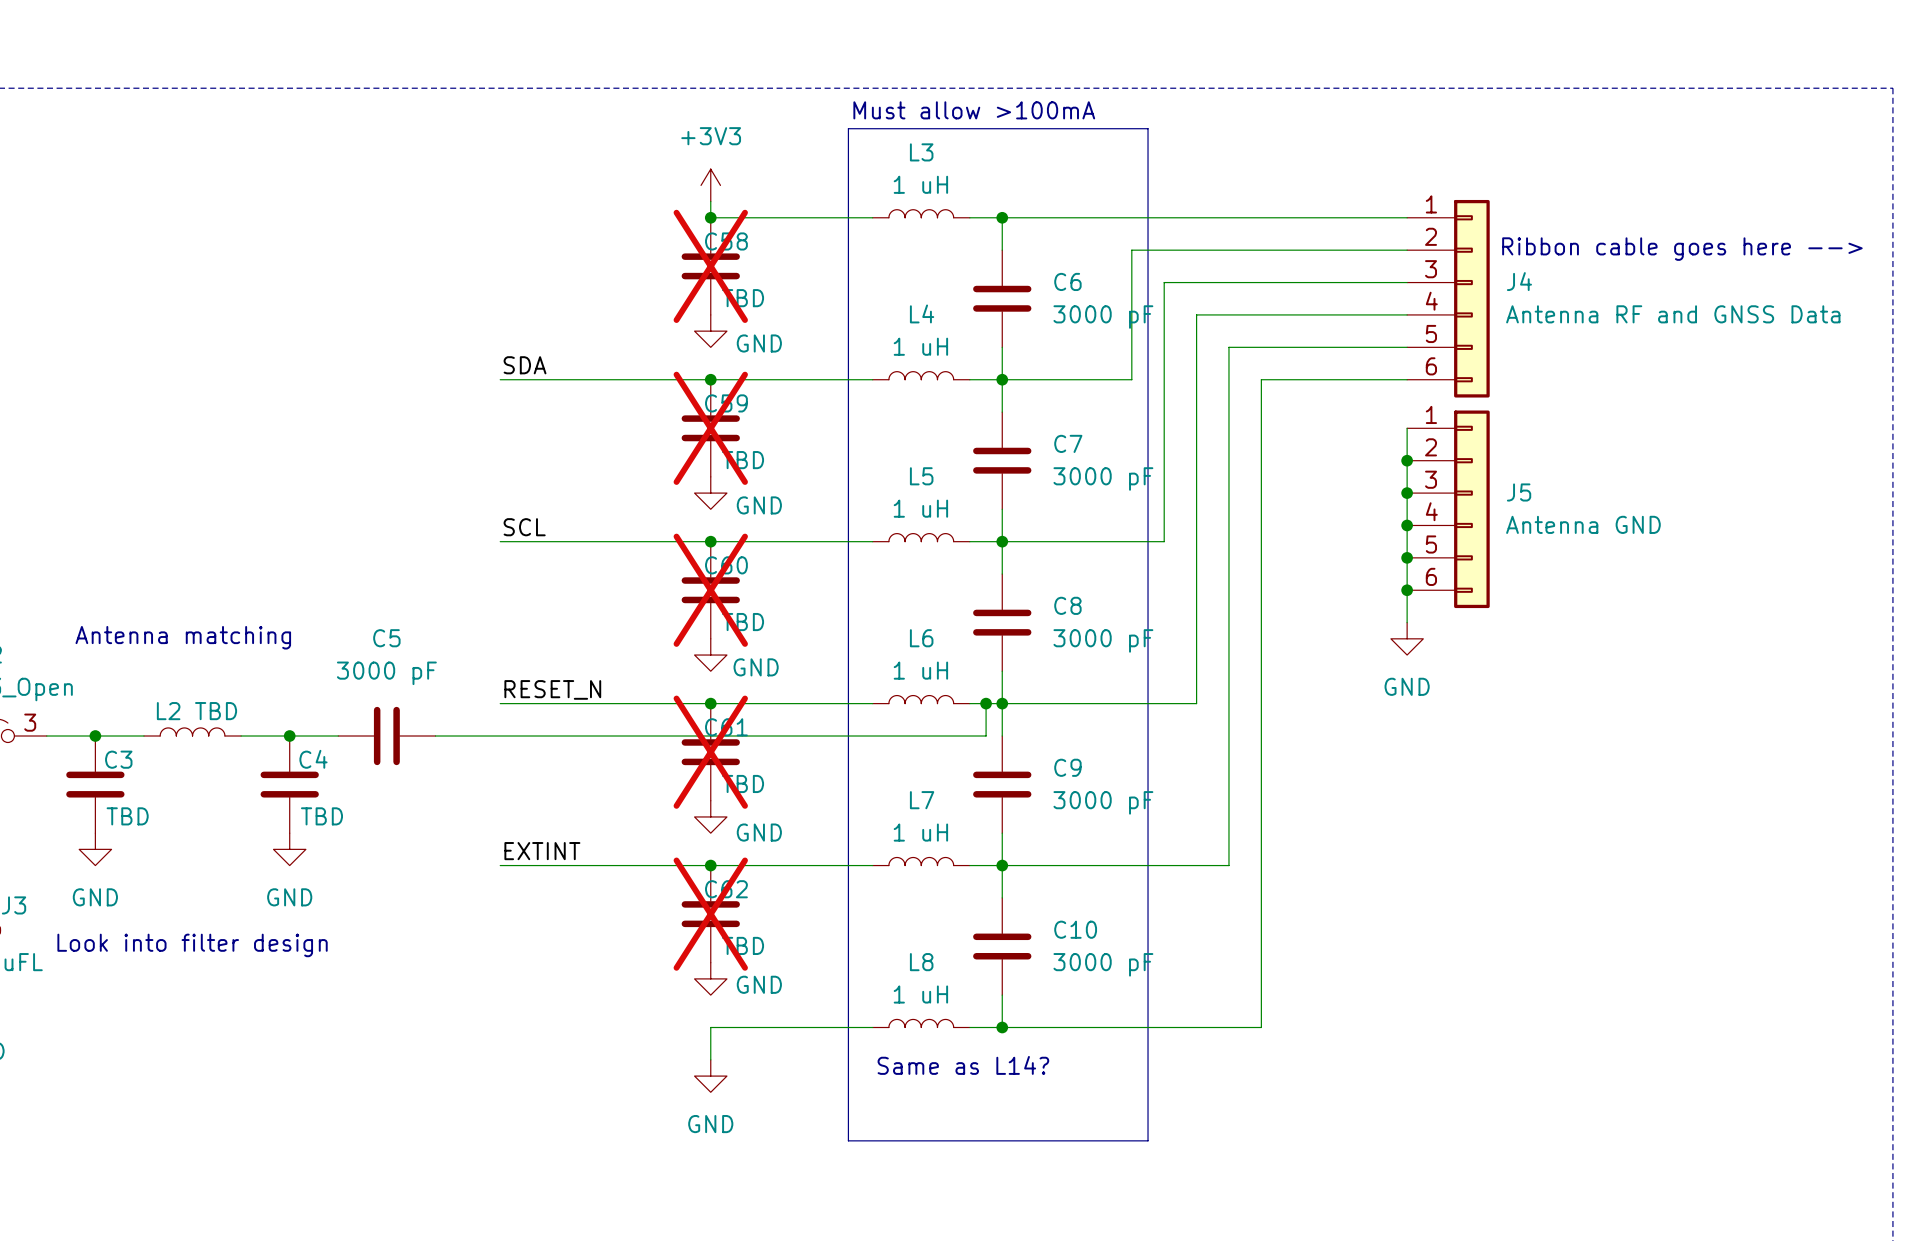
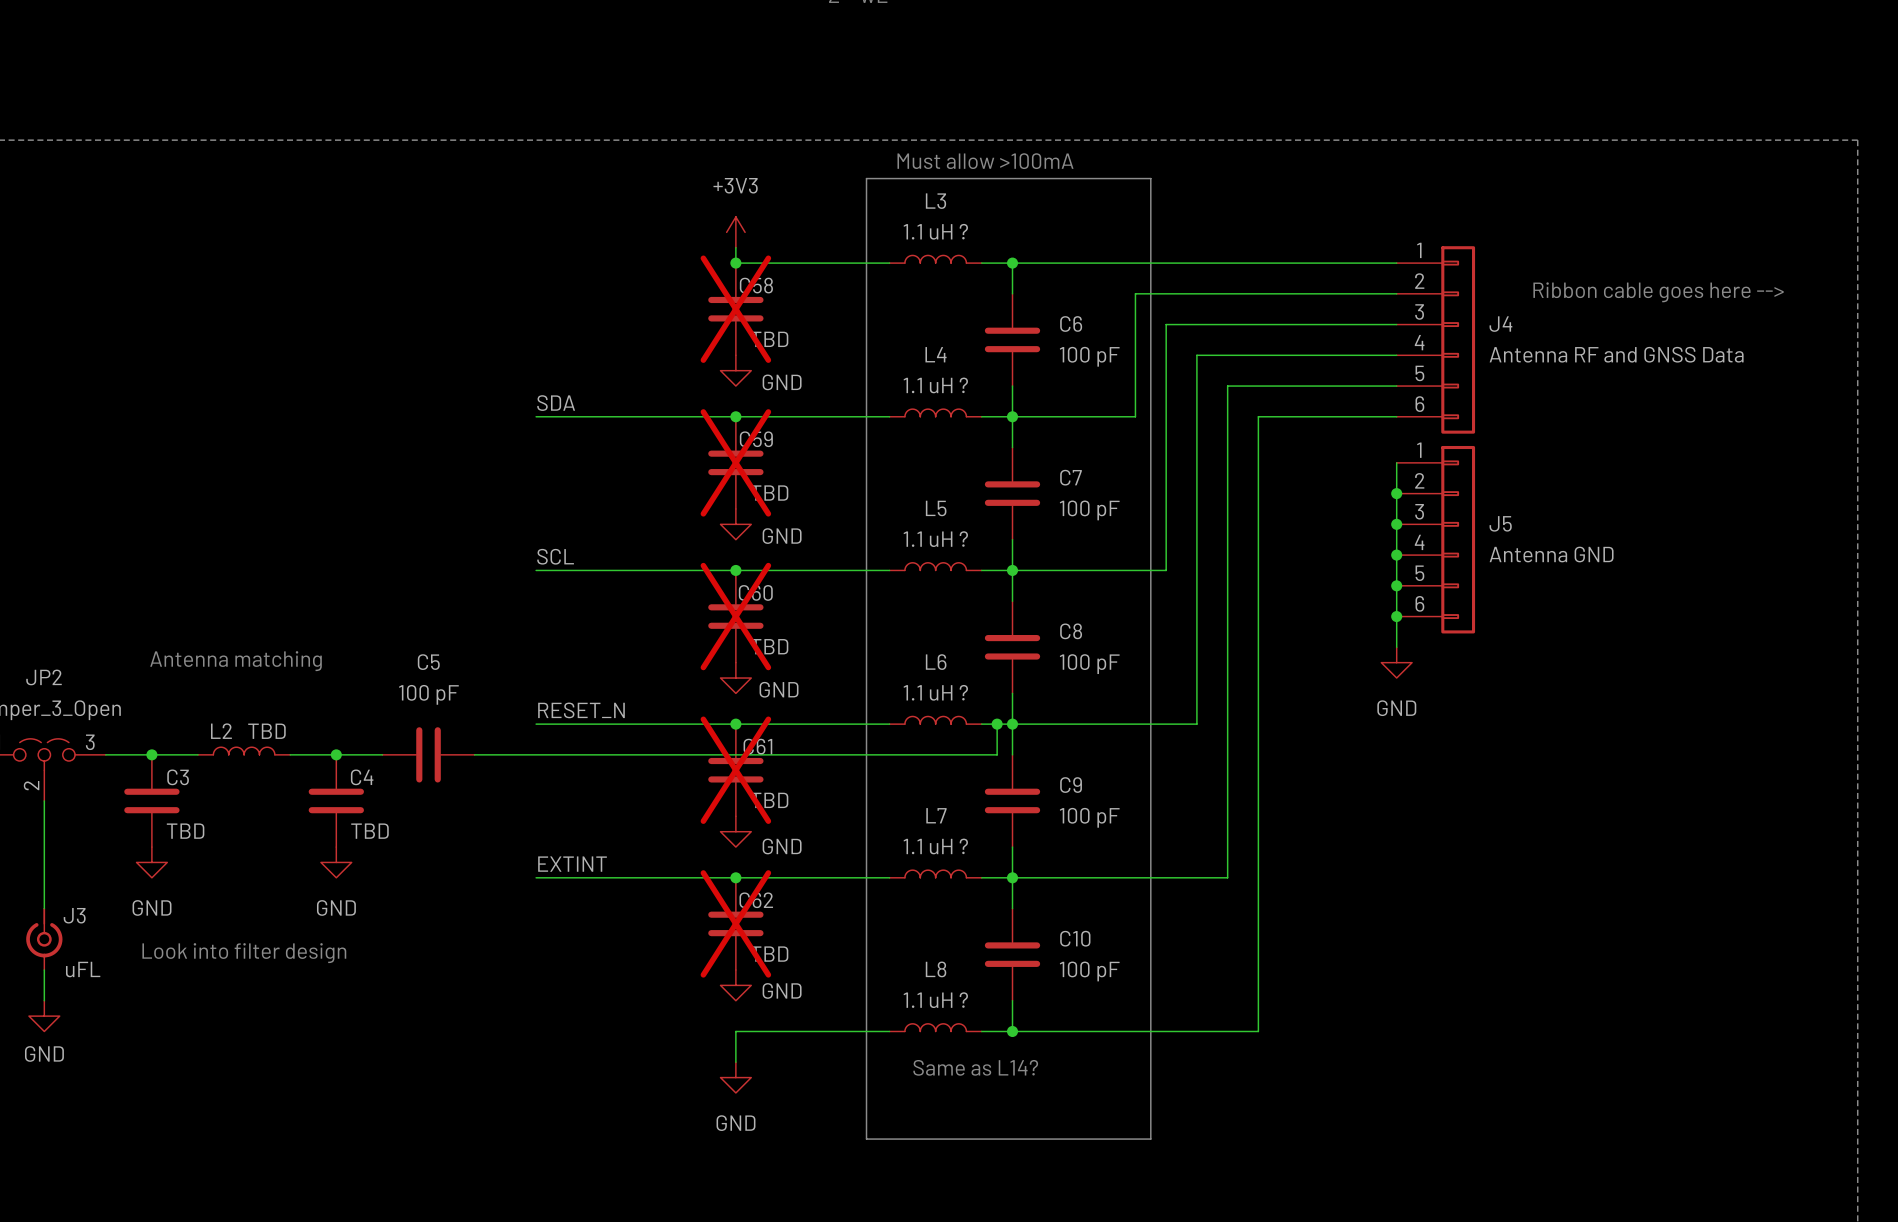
L3 value: 1 uH (920, 184) -> 1.1 uH ? (935, 231)
C6 value: 3000 pF (1103, 317) -> 100 pF (1089, 356)
L4 value: 1 uH (920, 346) -> 1.1 uH ? (935, 385)
C7 value: 3000 pF (1103, 478) -> 100 pF (1089, 510)
L5 value: 1 uH (920, 508) -> 1.1 uH ? (935, 539)
C8 value: 3000 pF (1103, 640) -> 100 pF (1089, 664)
L6 value: 1 uH (920, 670) -> 1.1 uH ? (935, 692)
C5 value: 3000 pF (386, 673) -> 100 pF (428, 694)
C9 value: 3000 pF (1103, 802) -> 100 pF (1089, 817)
L7 value: 1 uH (920, 832) -> 1.1 uH ? (935, 846)
C10 value: 3000 pF (1103, 964) -> 100 pF (1089, 971)
L8 value: 1 uH (920, 994) -> 1.1 uH ? (935, 1000)

